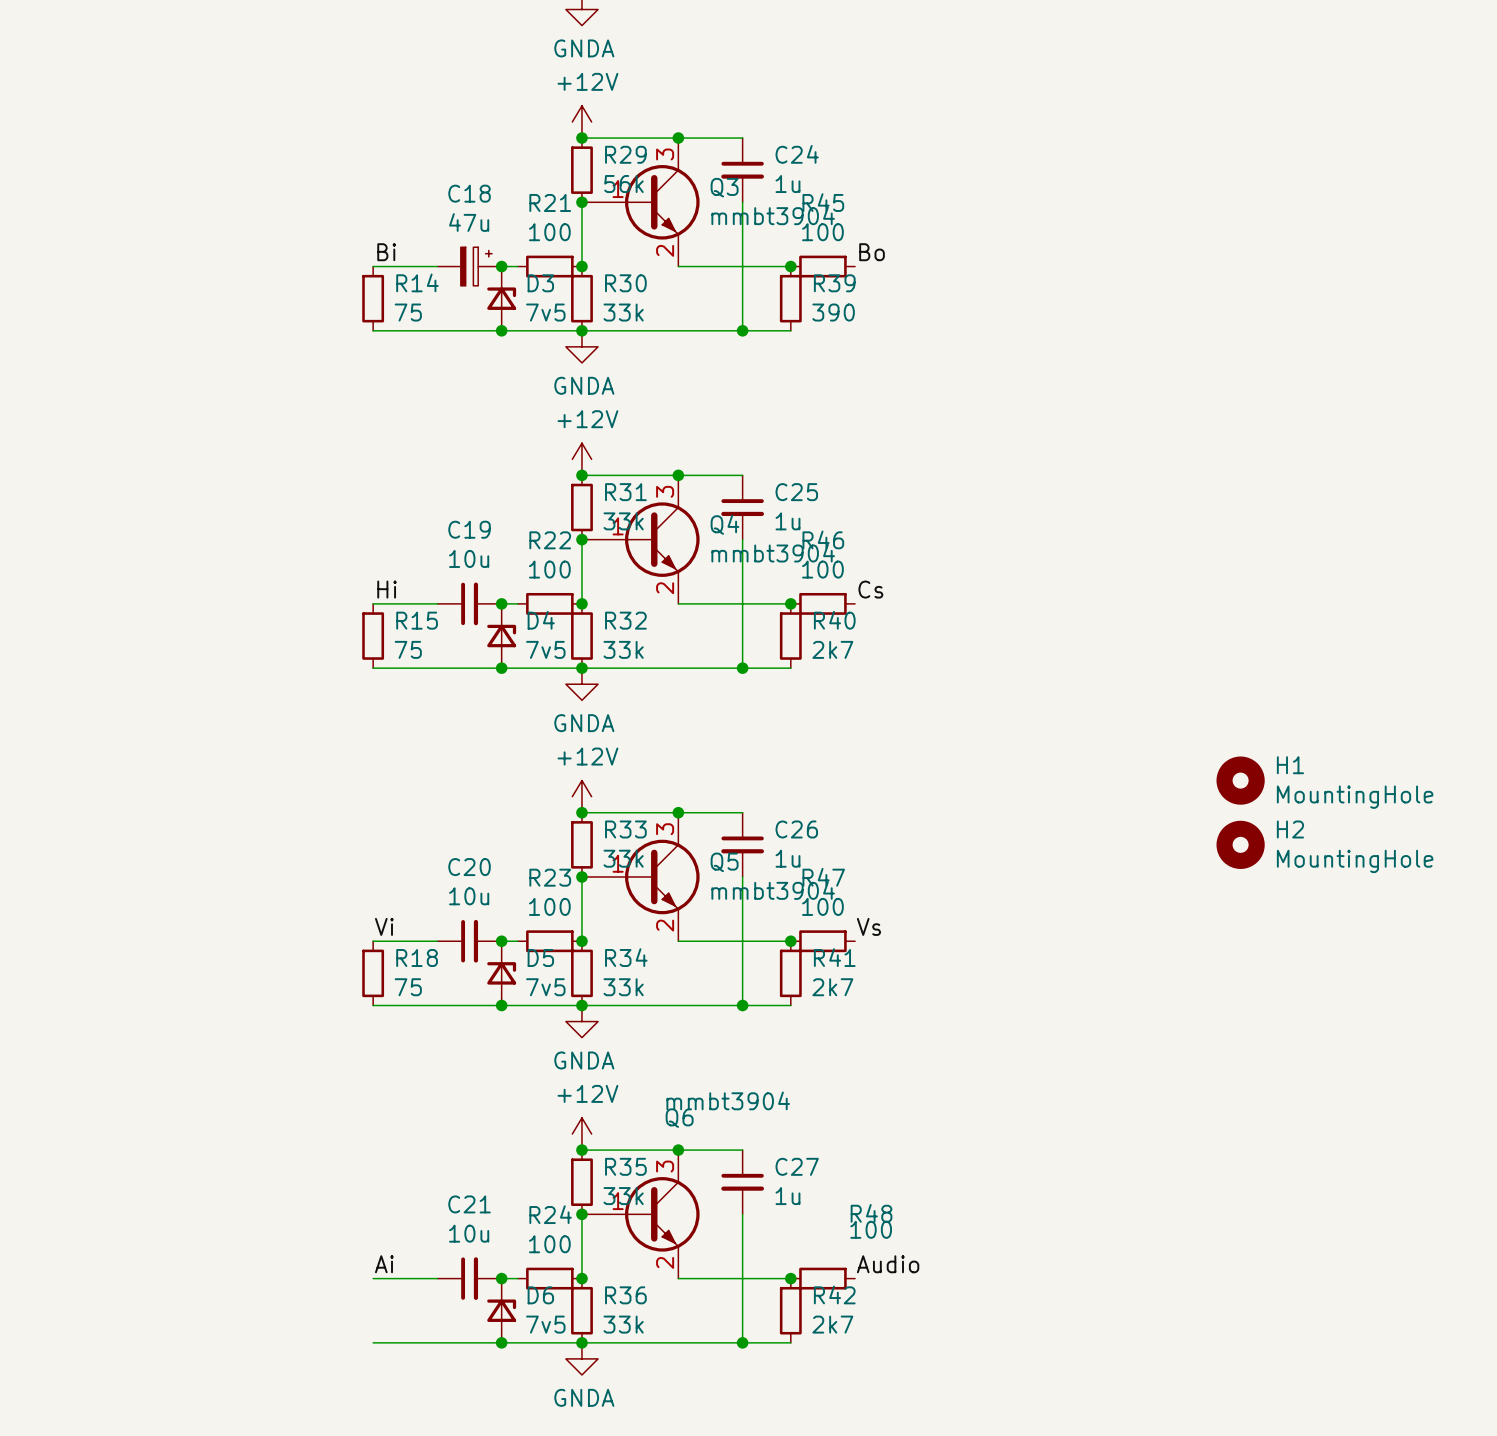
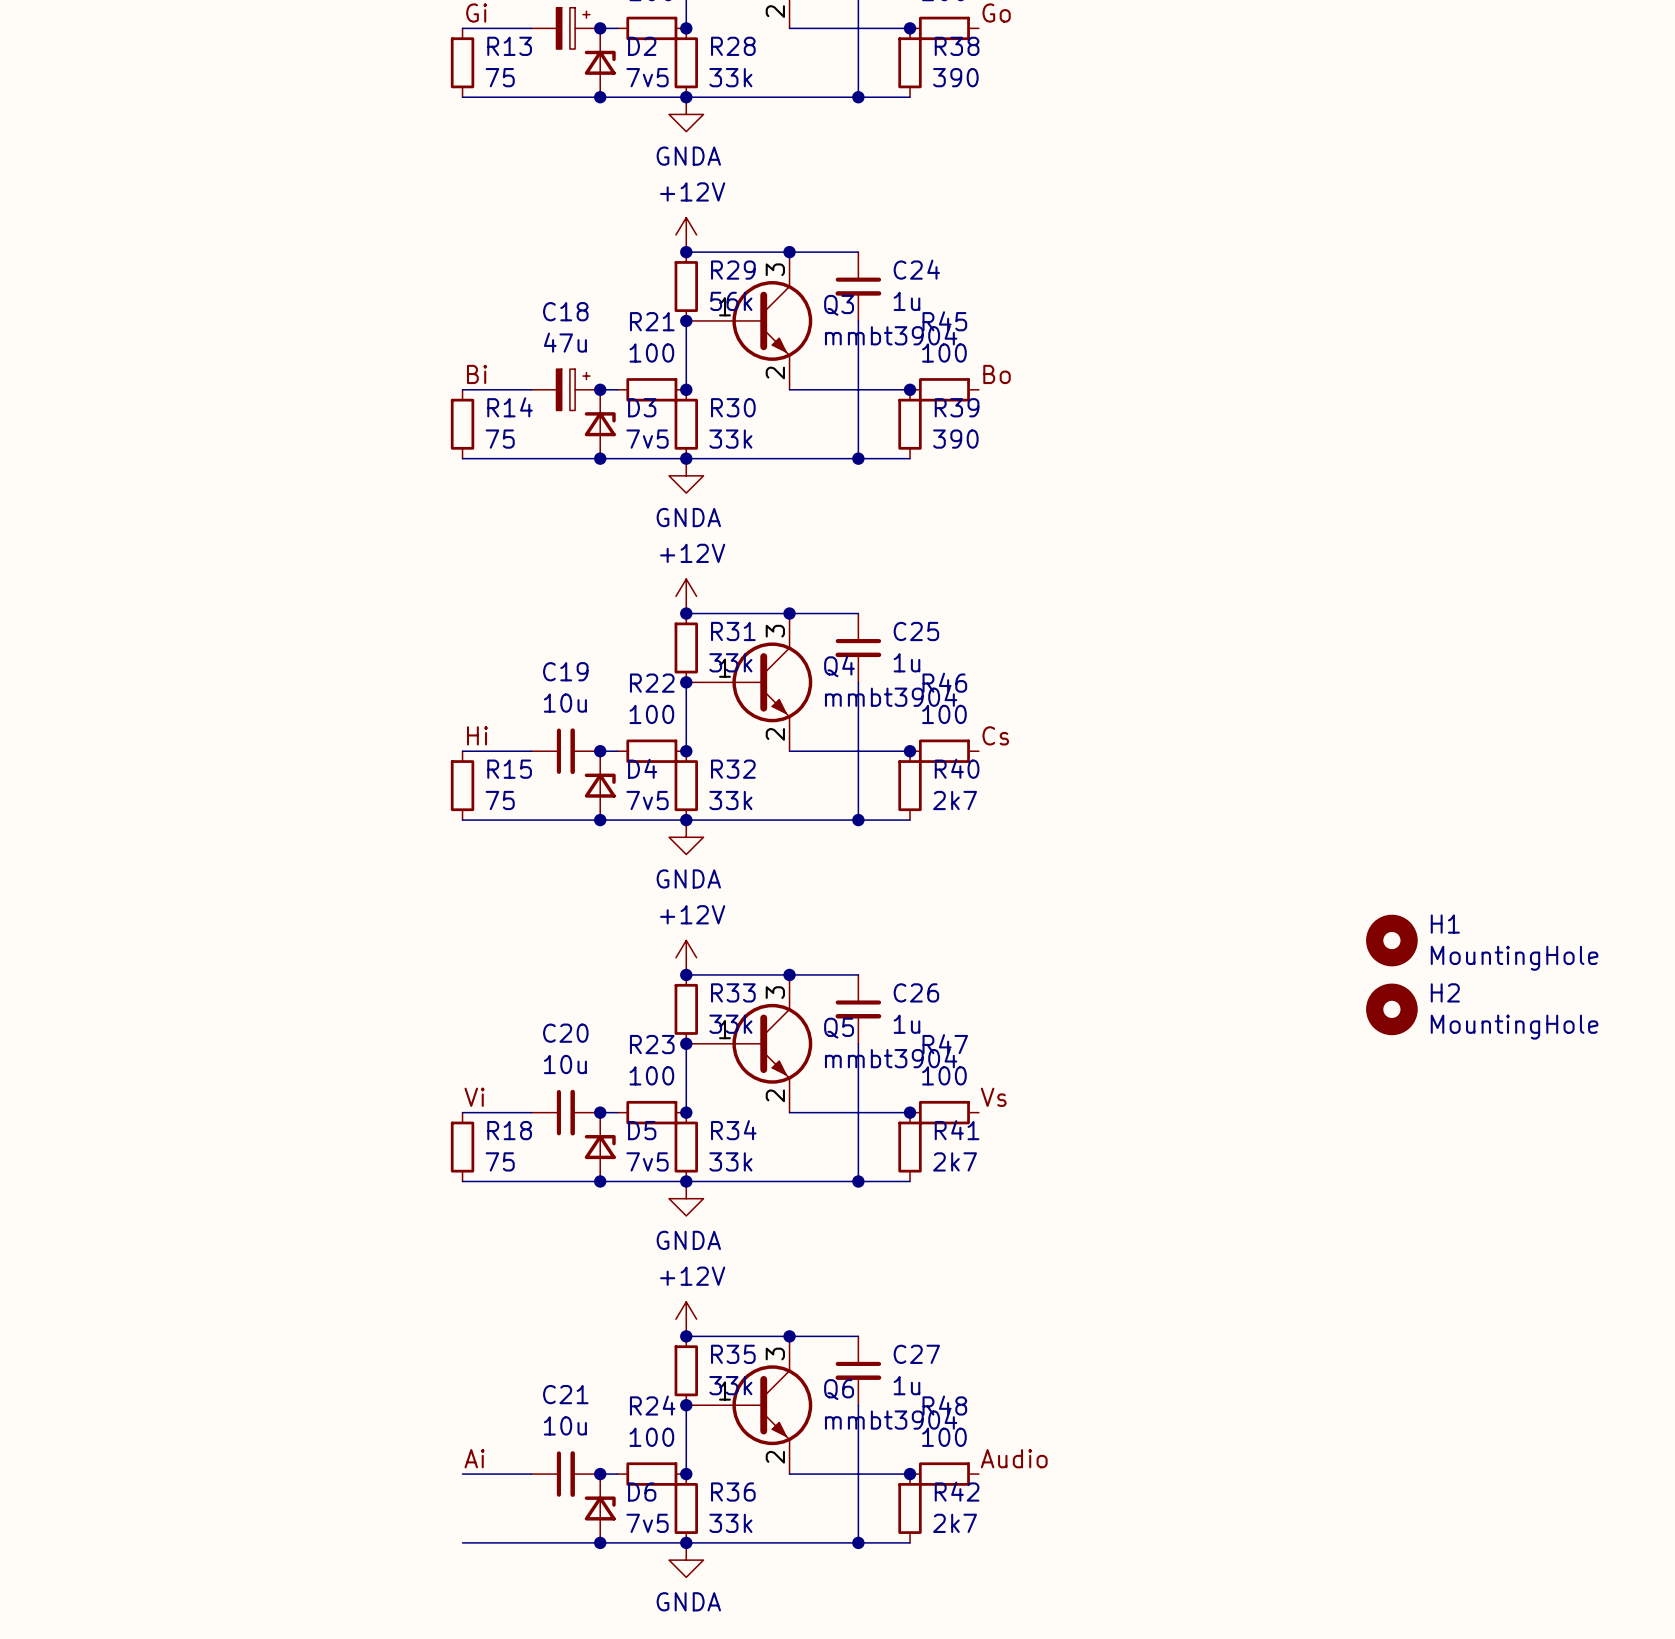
Q6 value position: mmbt3904 (728, 1100) -> mmbt3904 (891, 1419)
Q6 name position: Q6 (679, 1118) -> Q6 (839, 1389)
R48 name position: R48 (871, 1213) -> R48 (944, 1405)
R48 value position: 100 (871, 1229) -> 100 (944, 1437)

